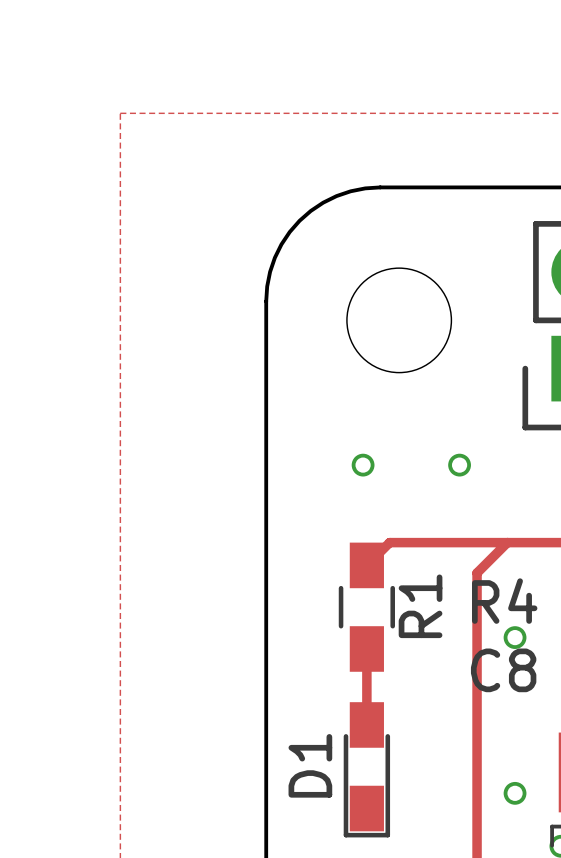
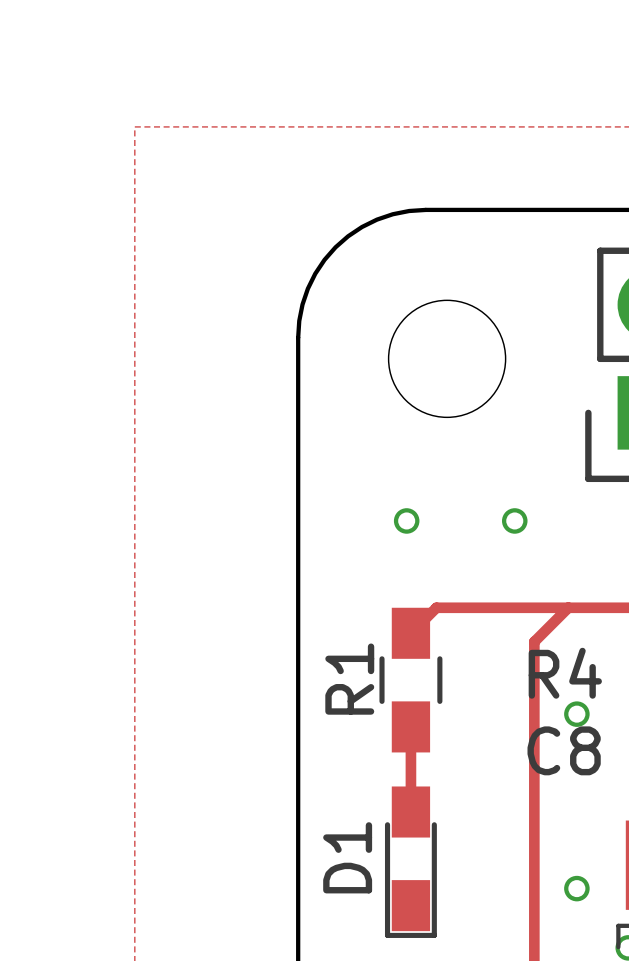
R1 name position: R1 (420, 606) -> R1 (349, 679)

